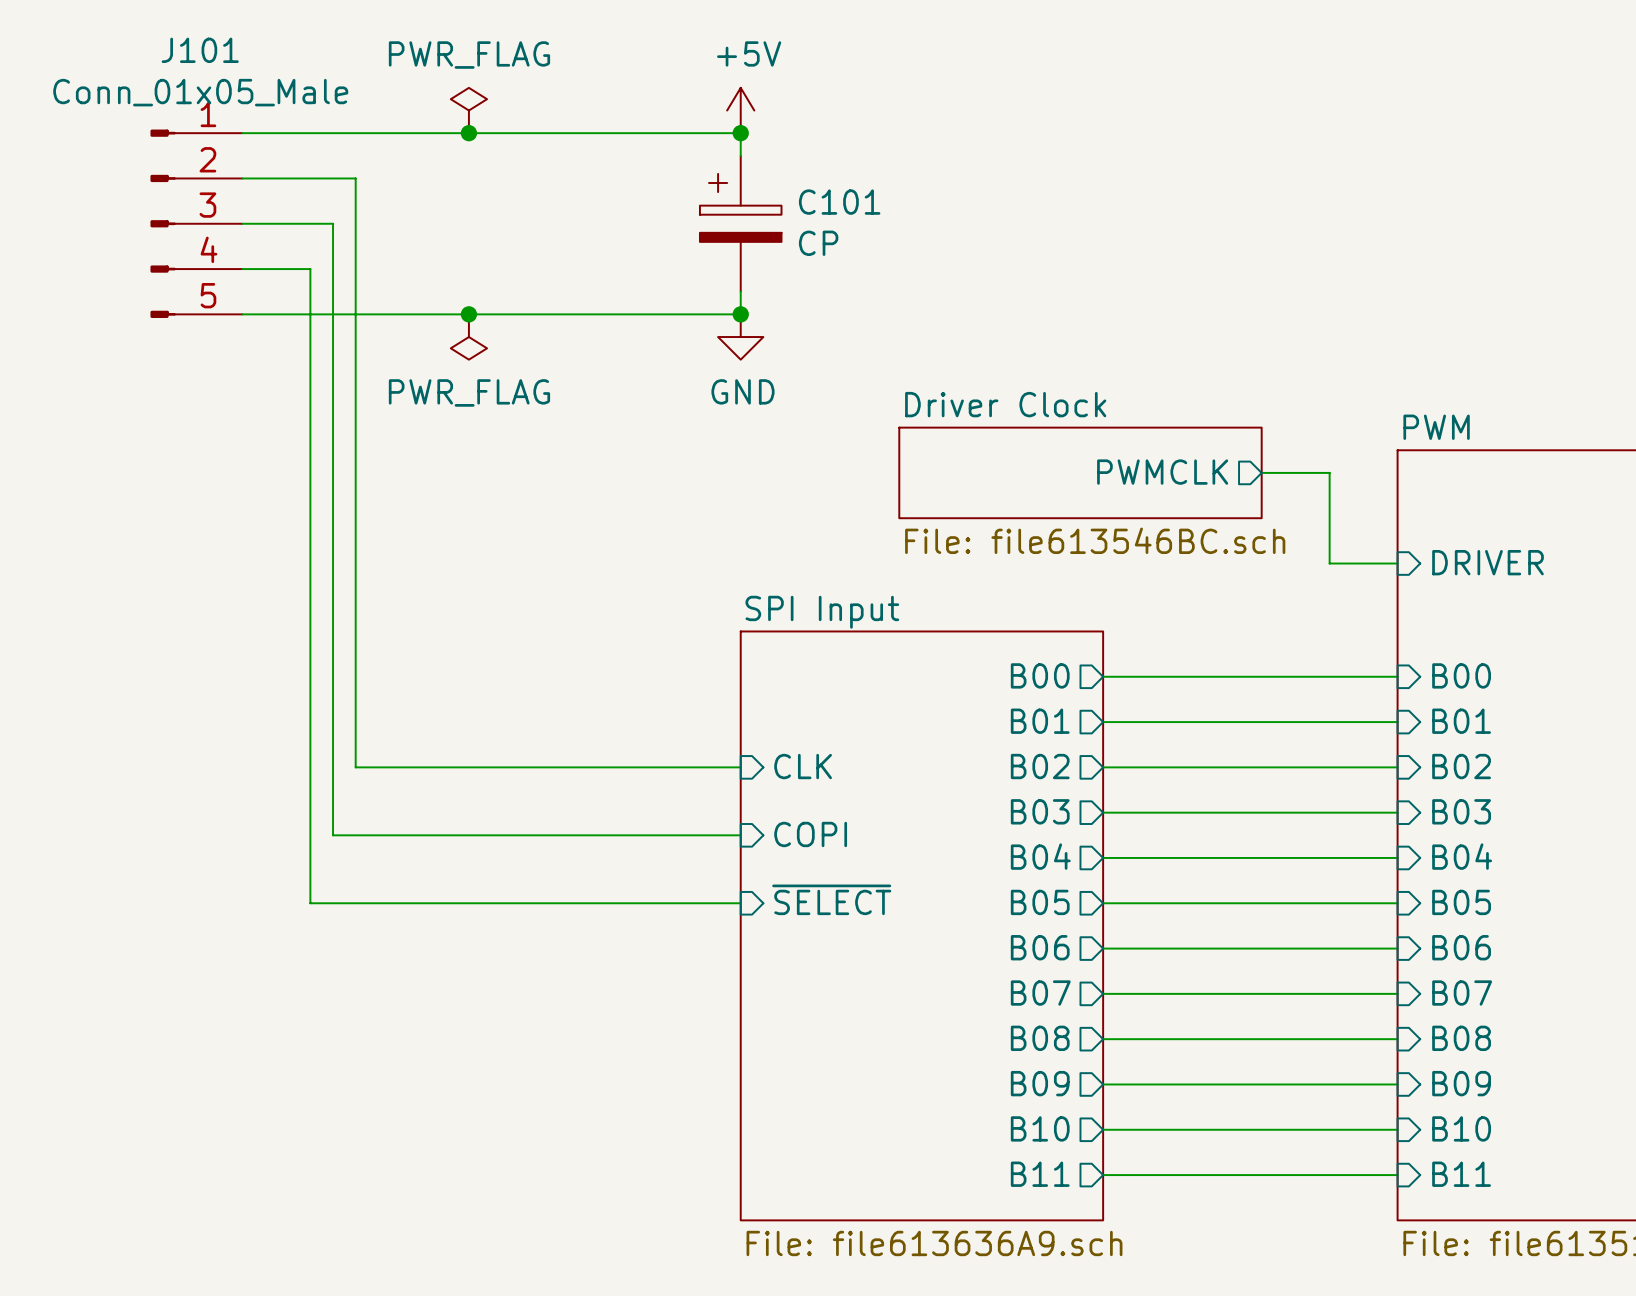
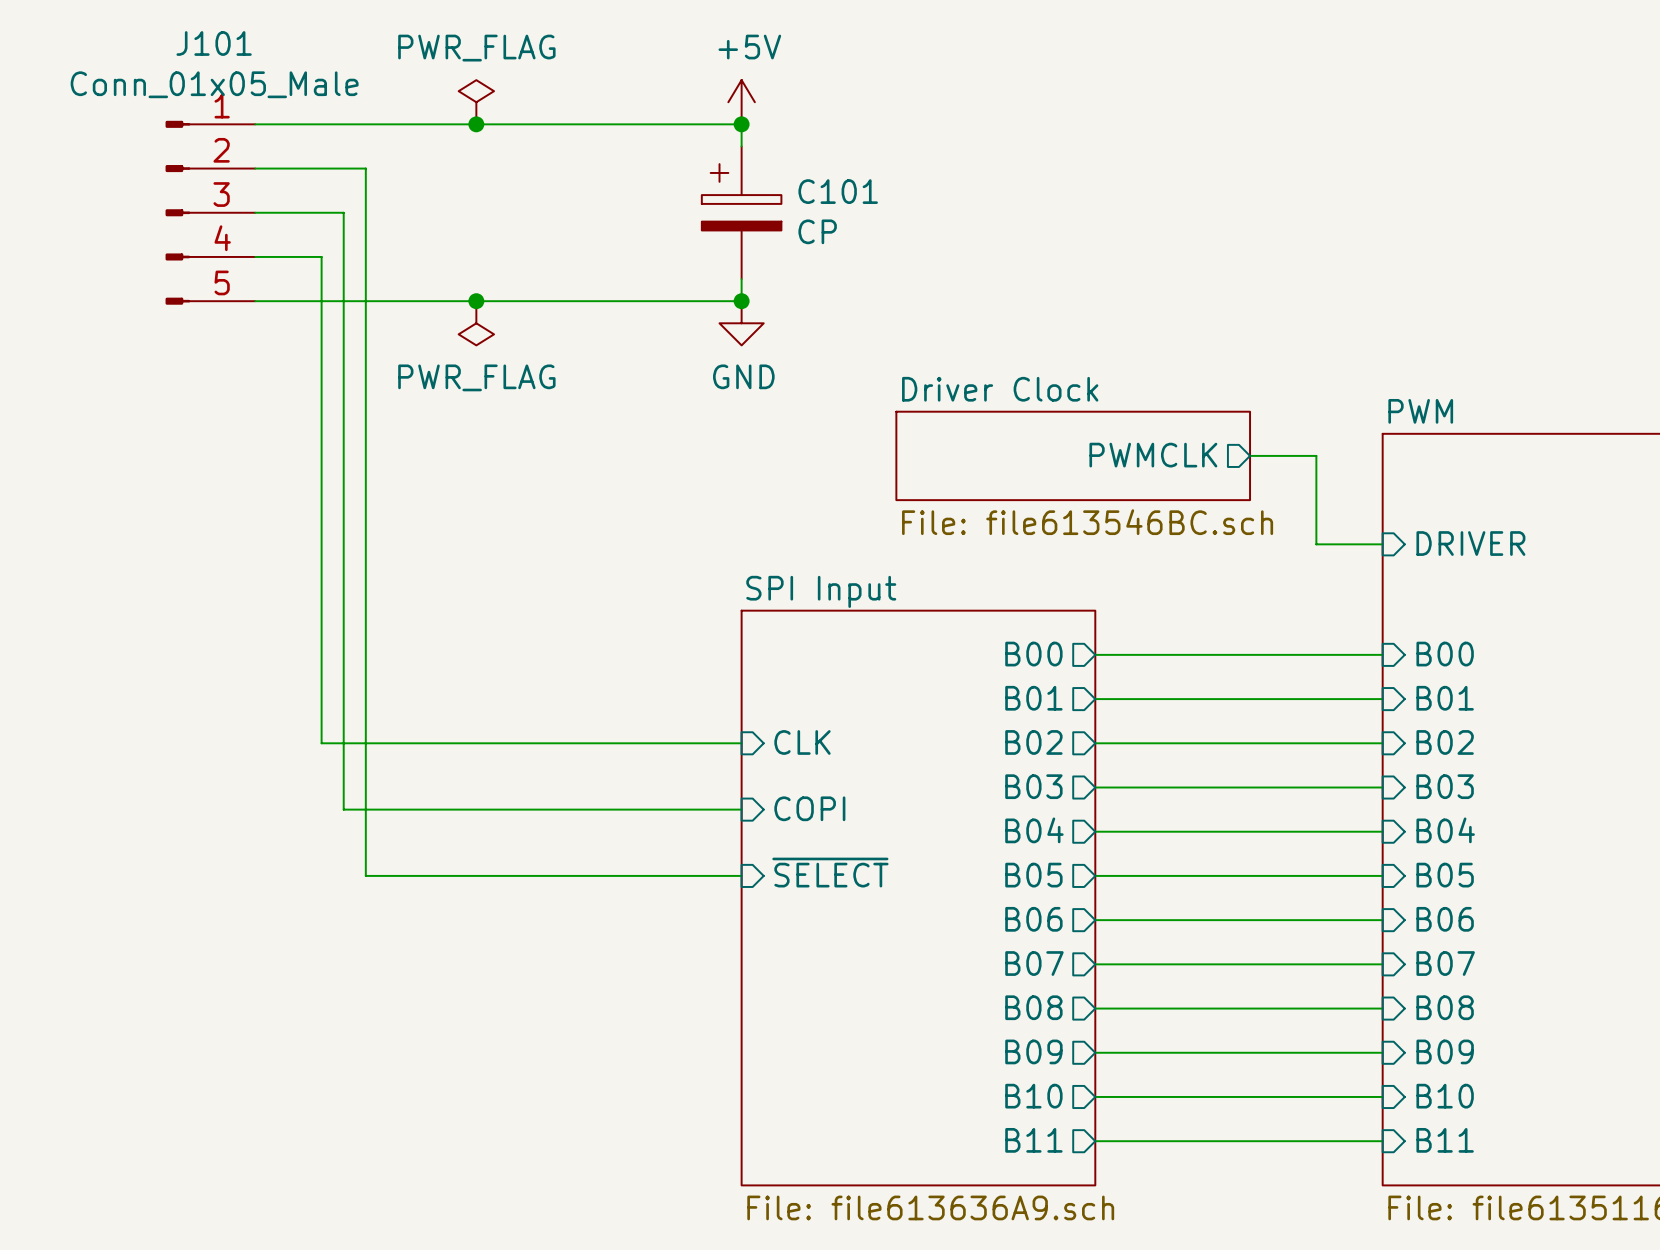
wire: (310, 767) (310, 903) (355, 903) -> (321, 743) (365, 743) (365, 875)

